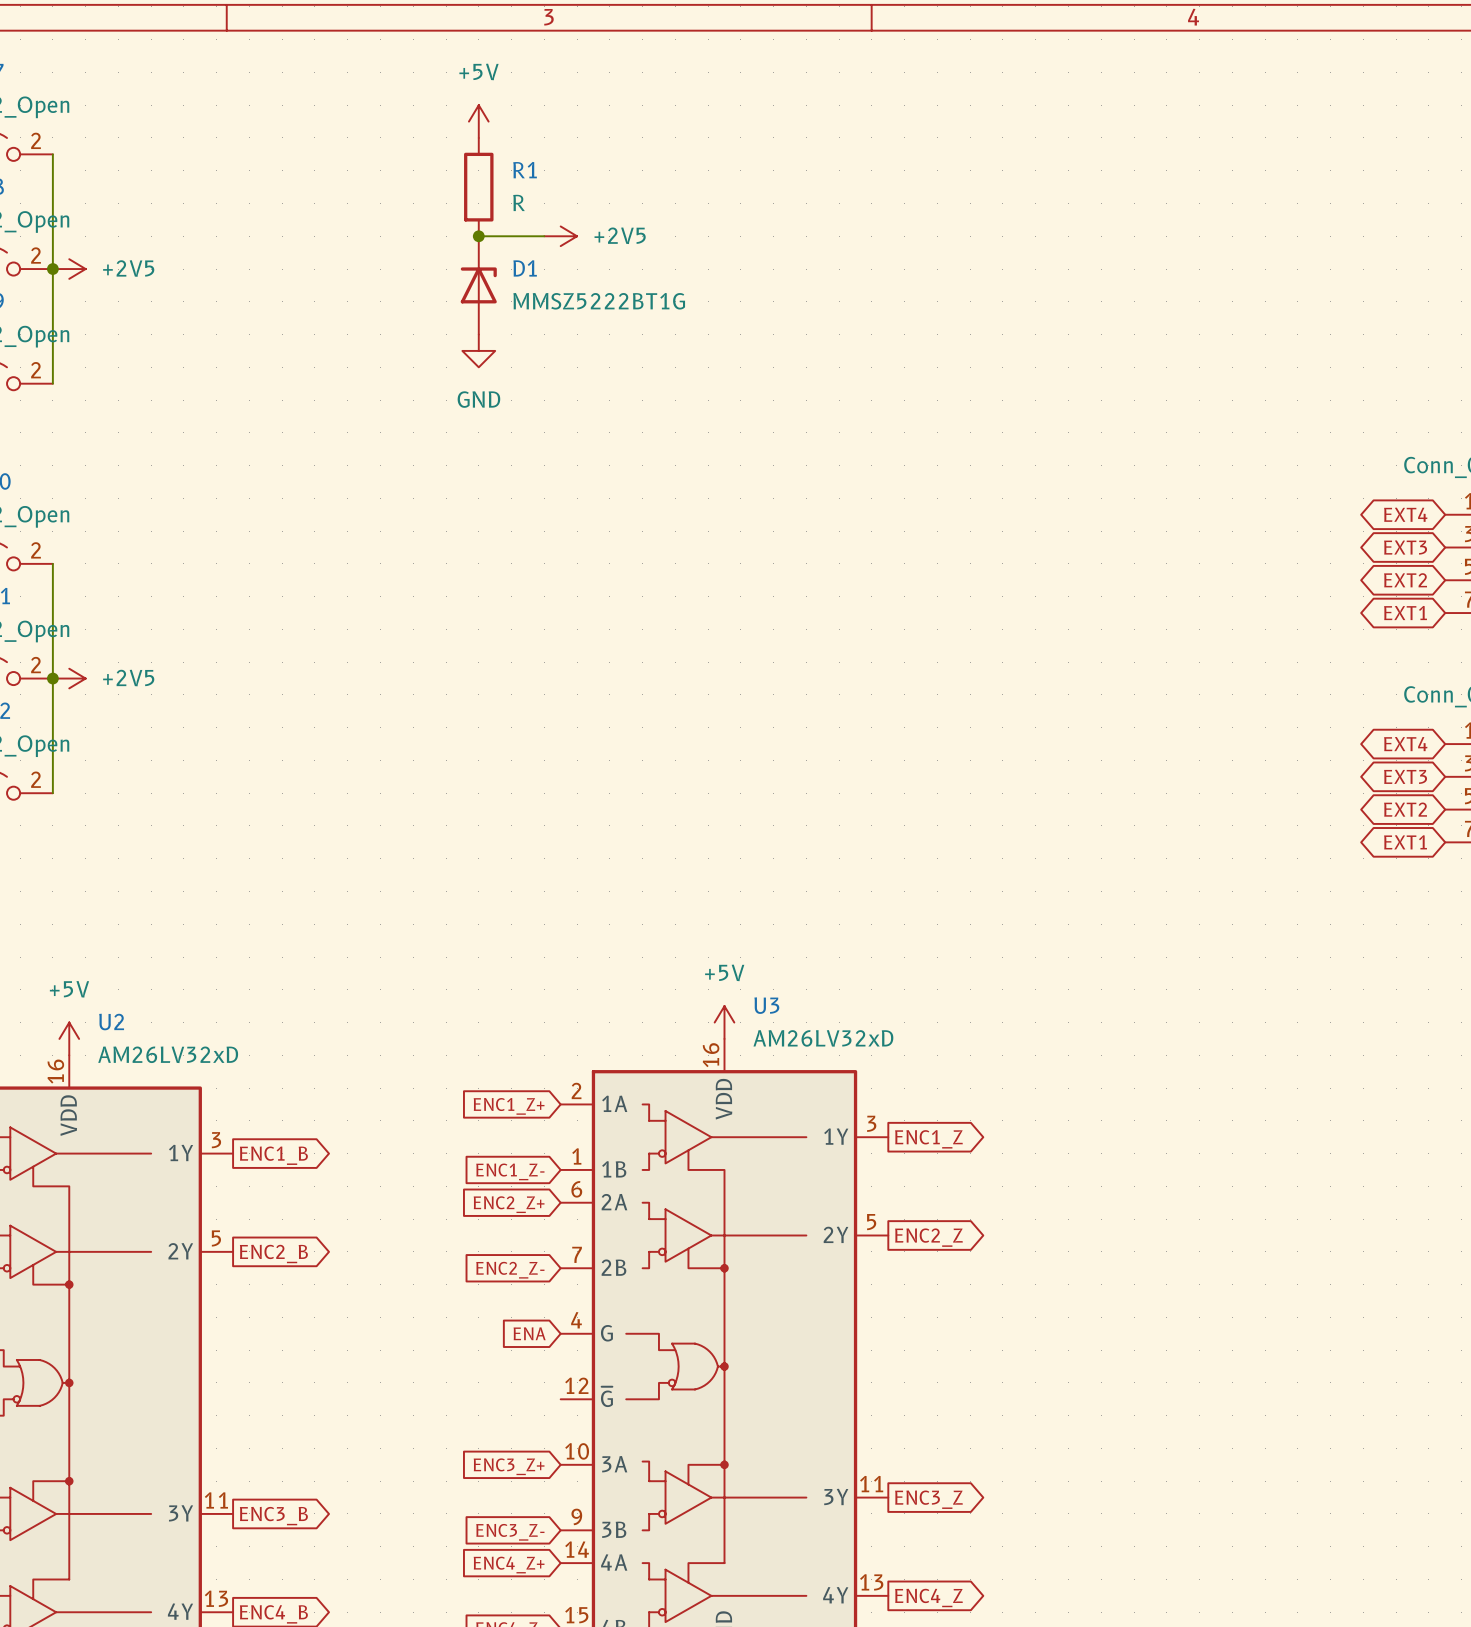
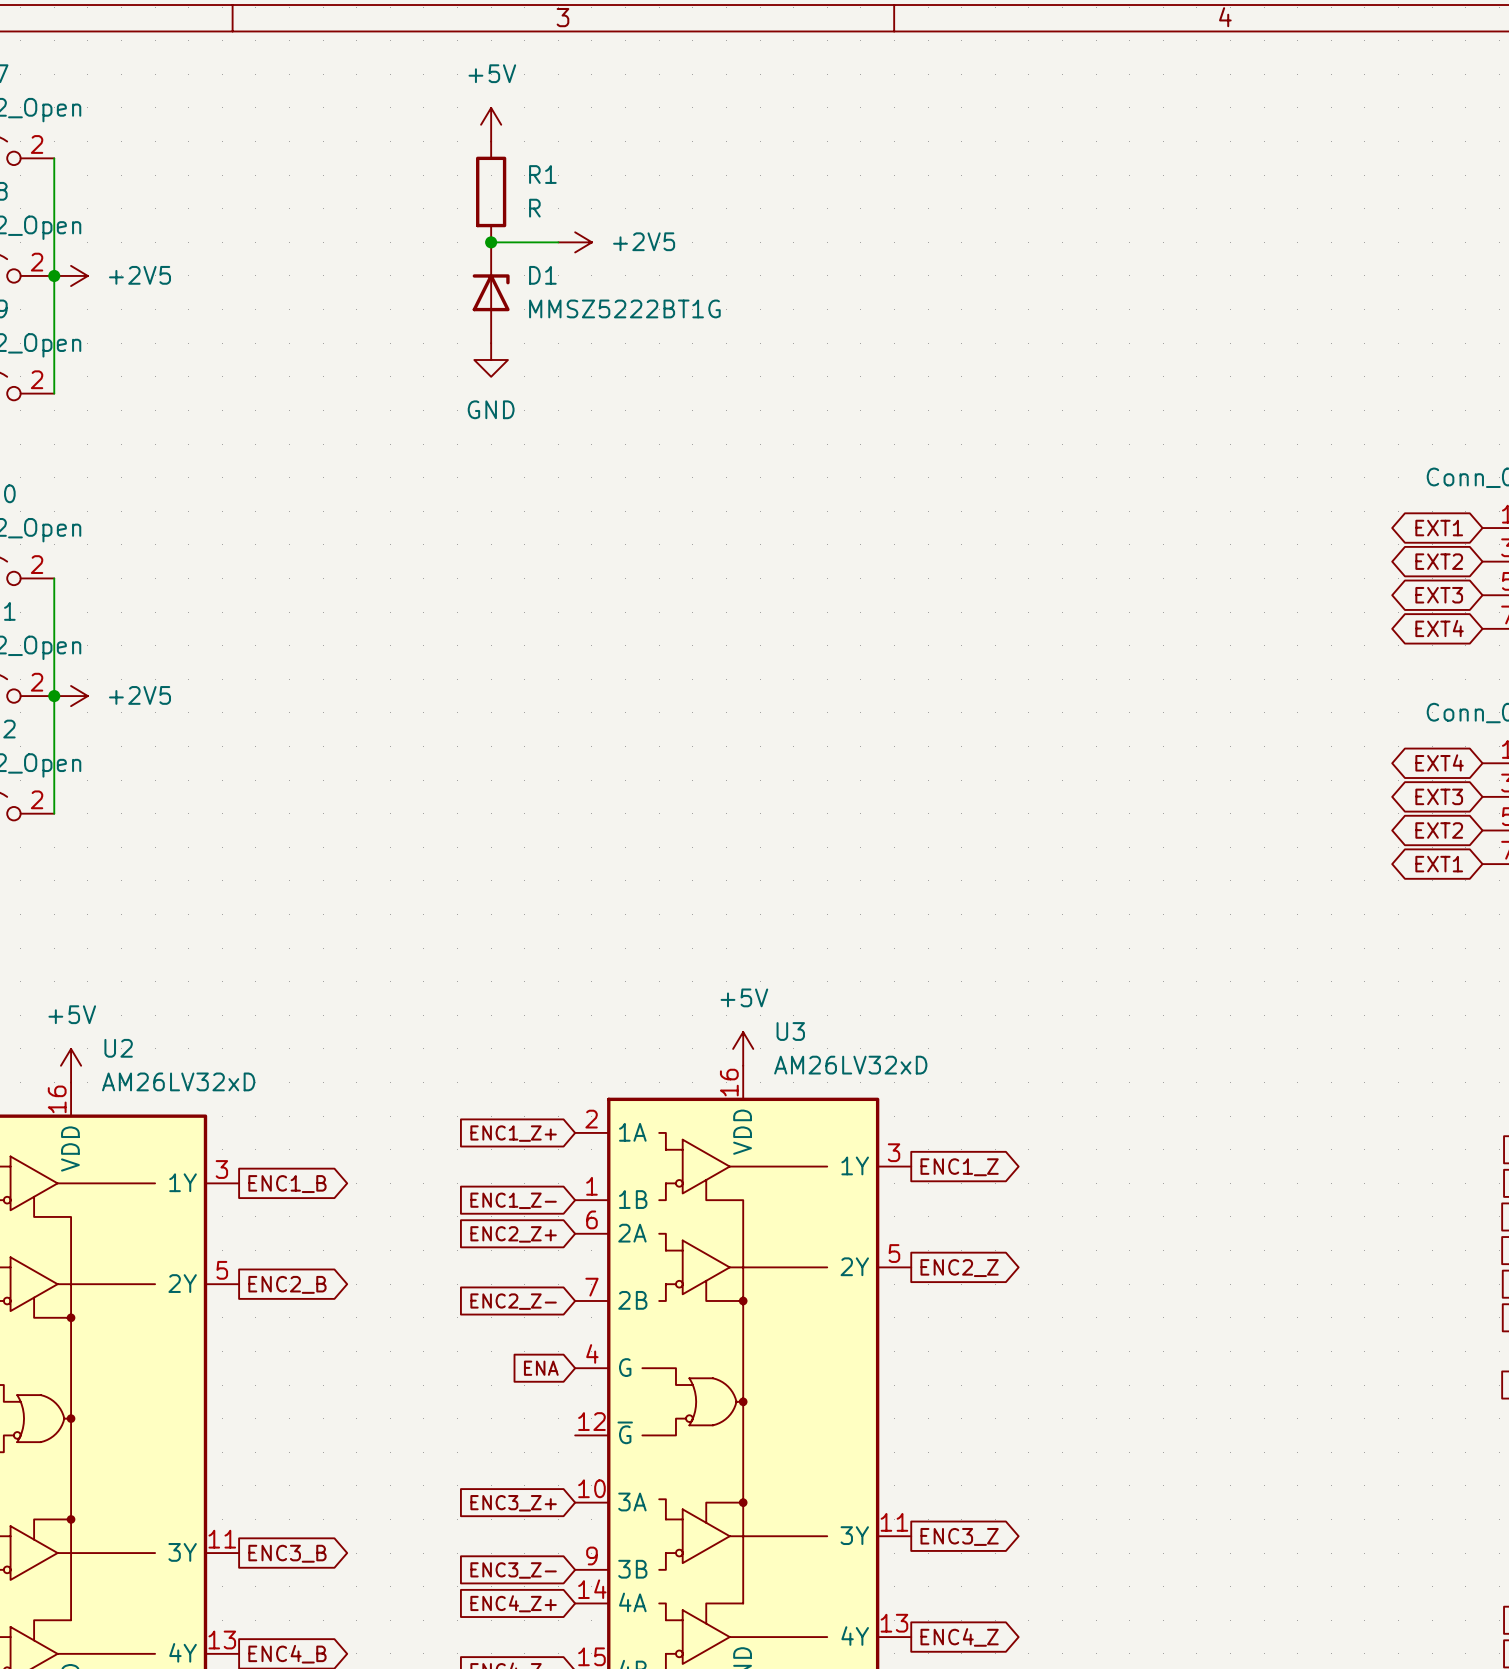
global label: EXT4 (1405, 514) -> EXT1 (1439, 528)
global label: EXT3 (1405, 547) -> EXT2 (1439, 561)
global label: EXT2 (1405, 580) -> EXT3 (1439, 595)
global label: EXT1 (1405, 613) -> EXT4 (1439, 628)

